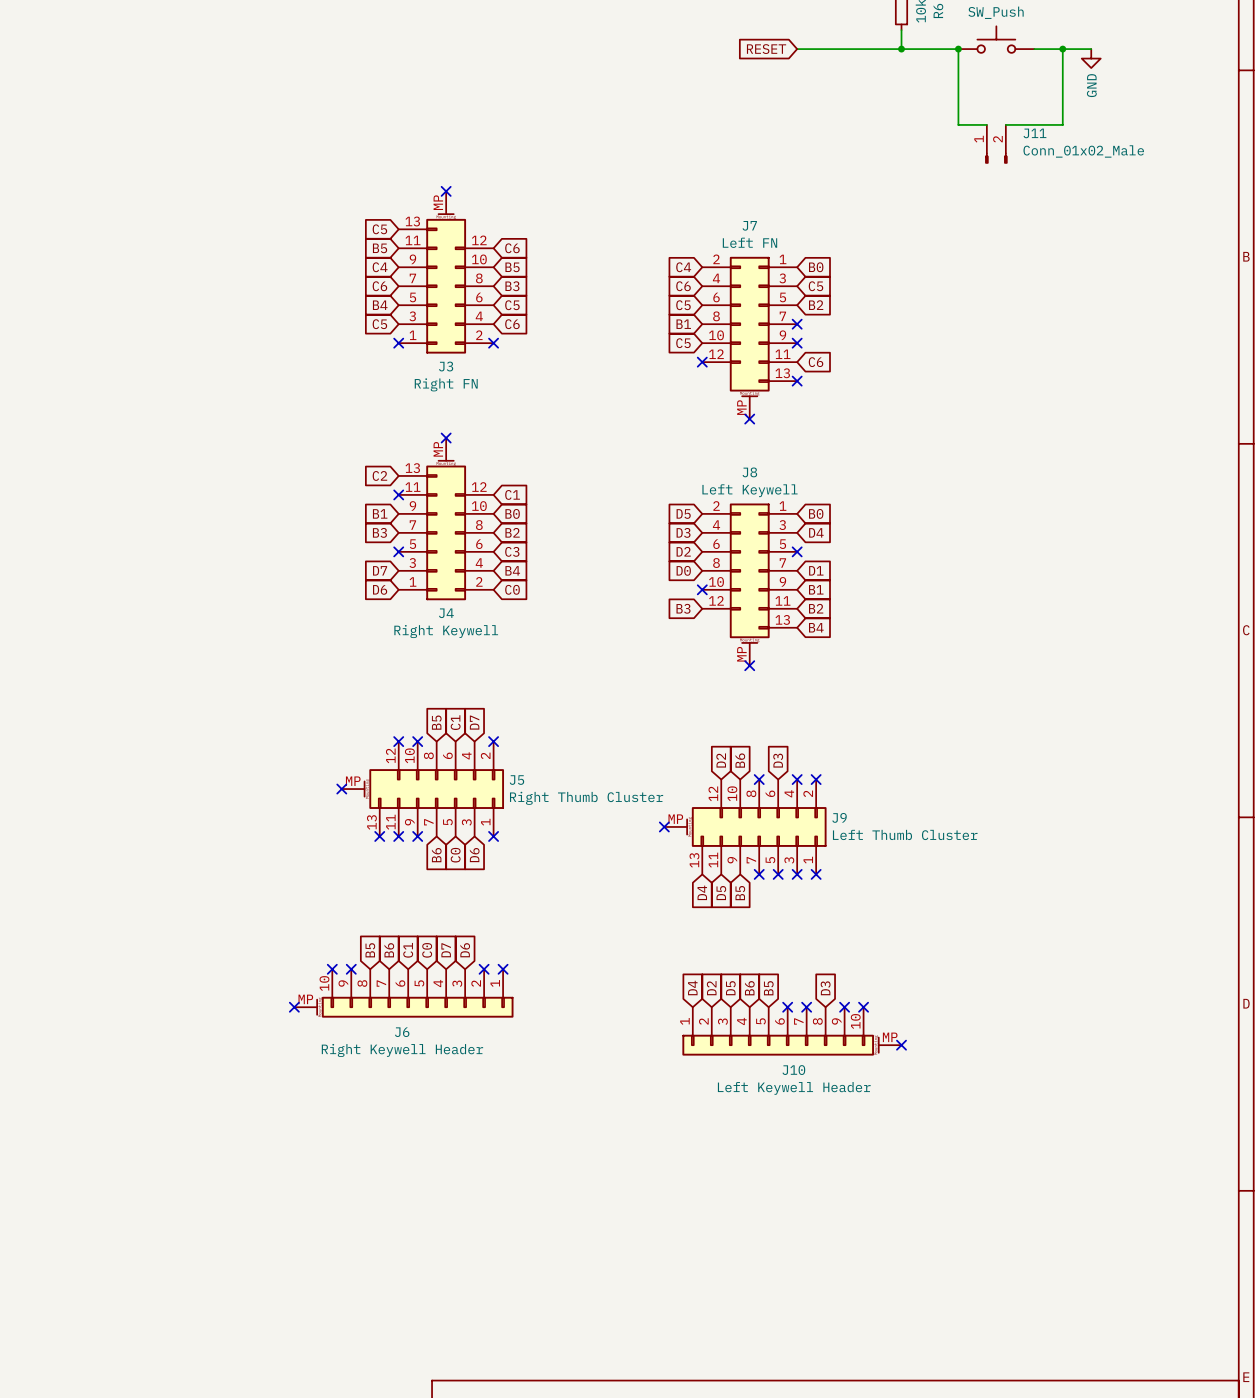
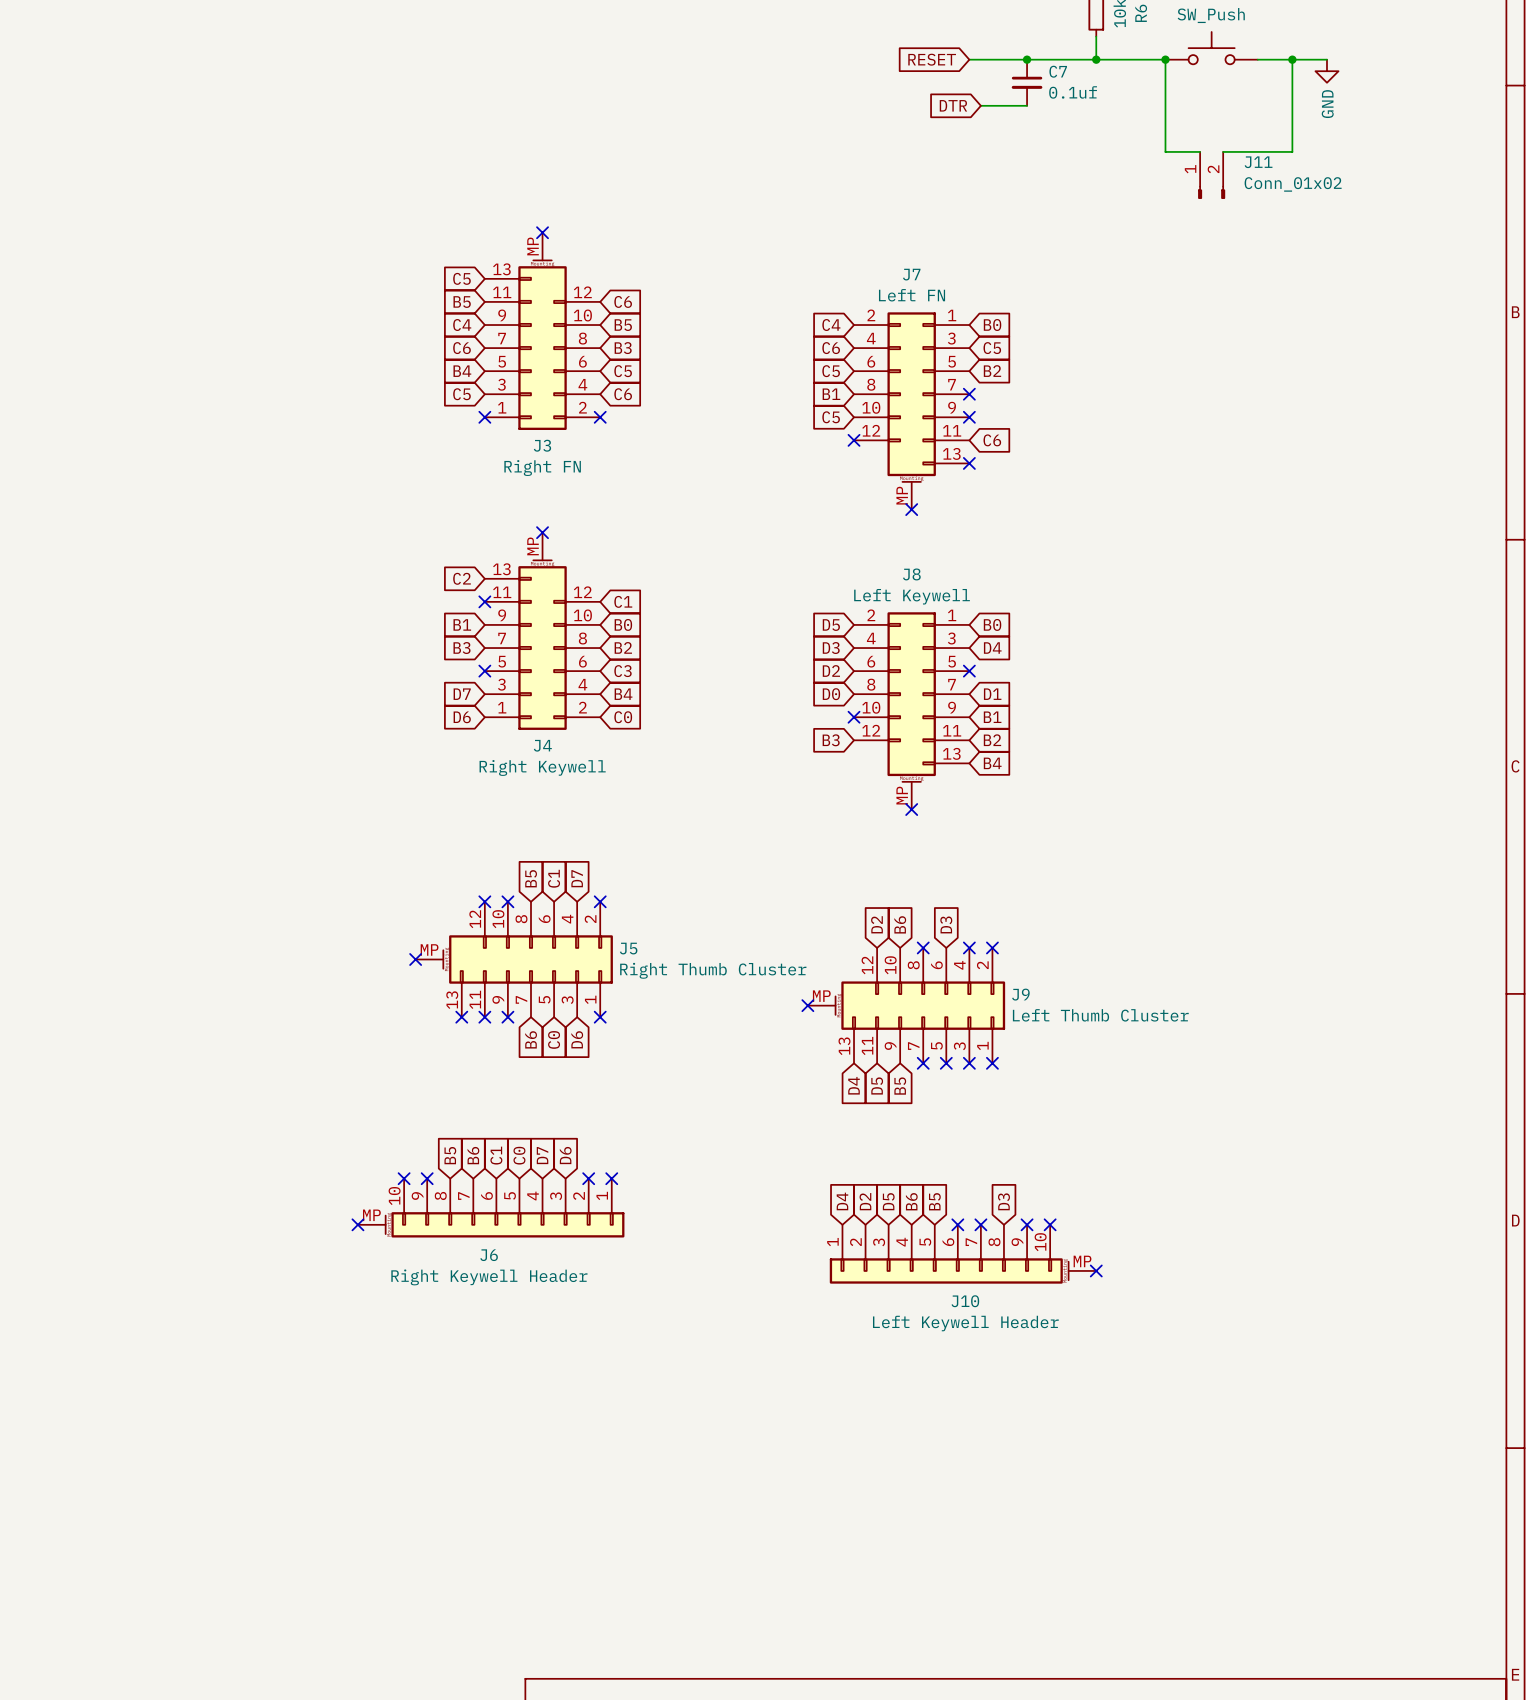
junction: none -> (1027, 59)
C7: none -> 0.1uf (1027, 82)
global label: none -> DTR (953, 105)
wire: none -> (980, 105) (1027, 105)
J11 value: Conn_01x02_Male (1083, 151) -> Conn_01x02 (1293, 184)

